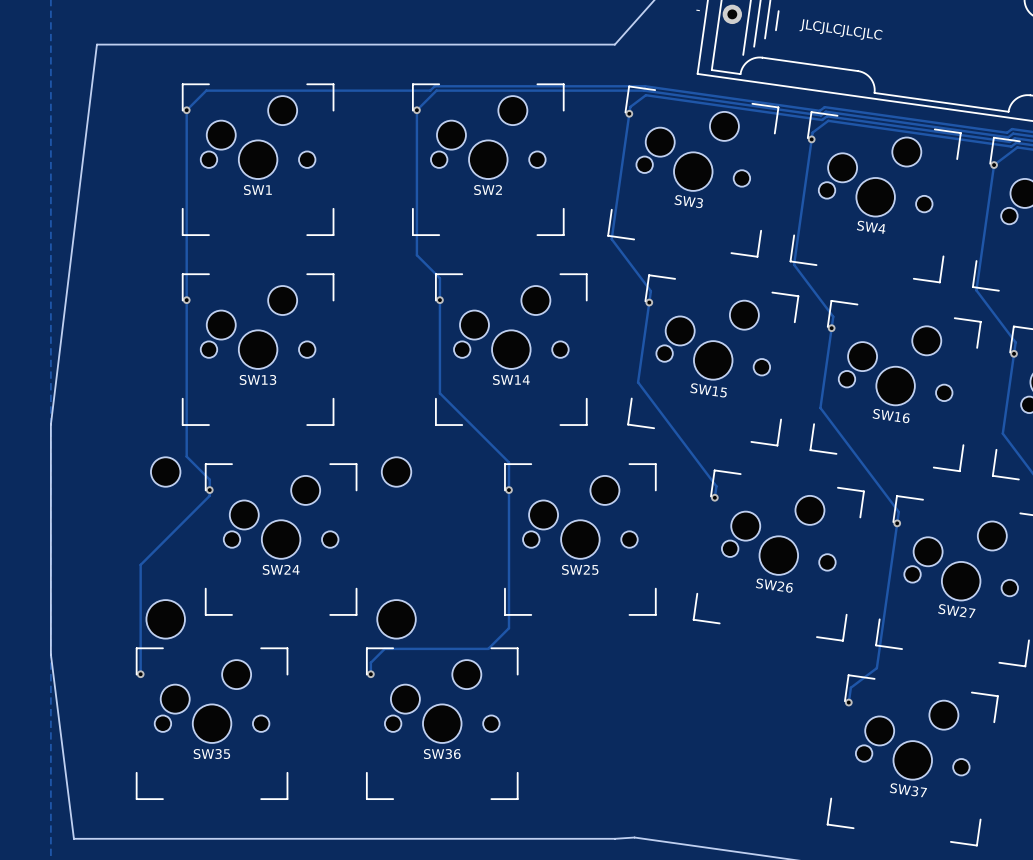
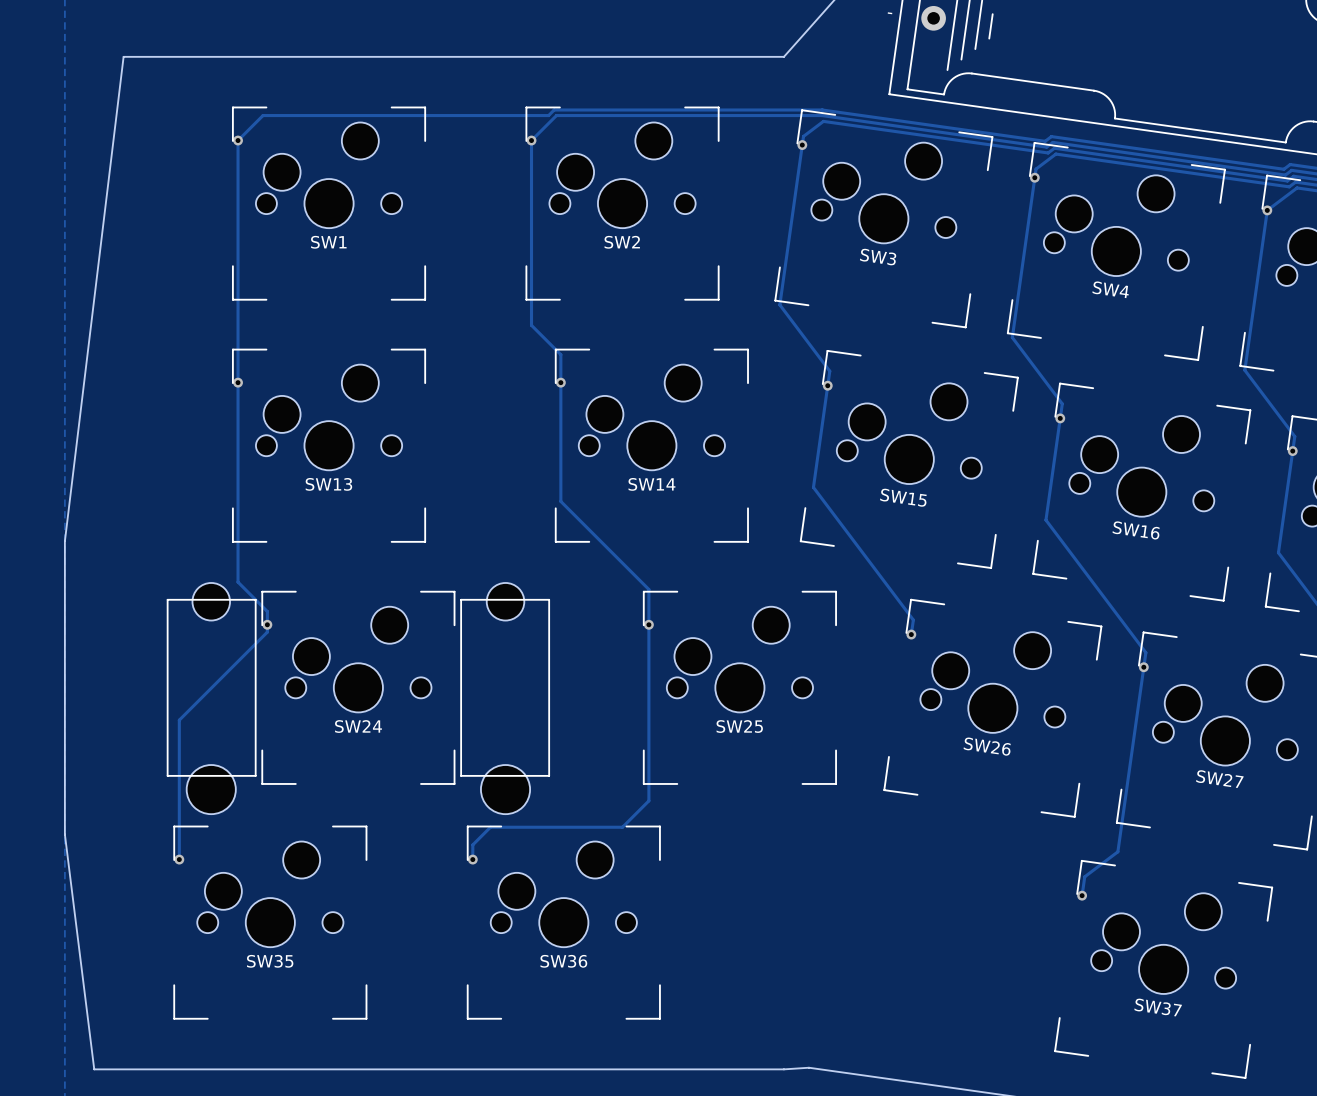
text: JLCJLCJLCJLC (841, 29) -> none
SW24 footprint: [146, 457, 416, 639] -> [166, 582, 550, 815]

